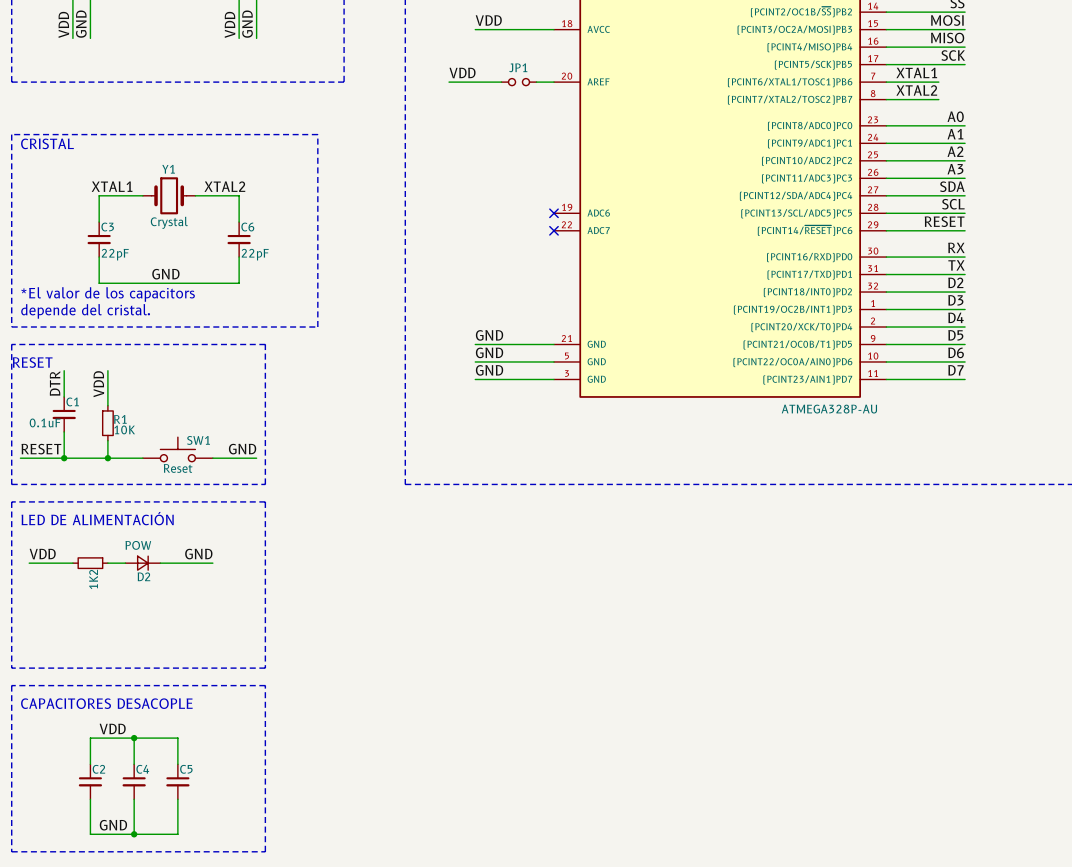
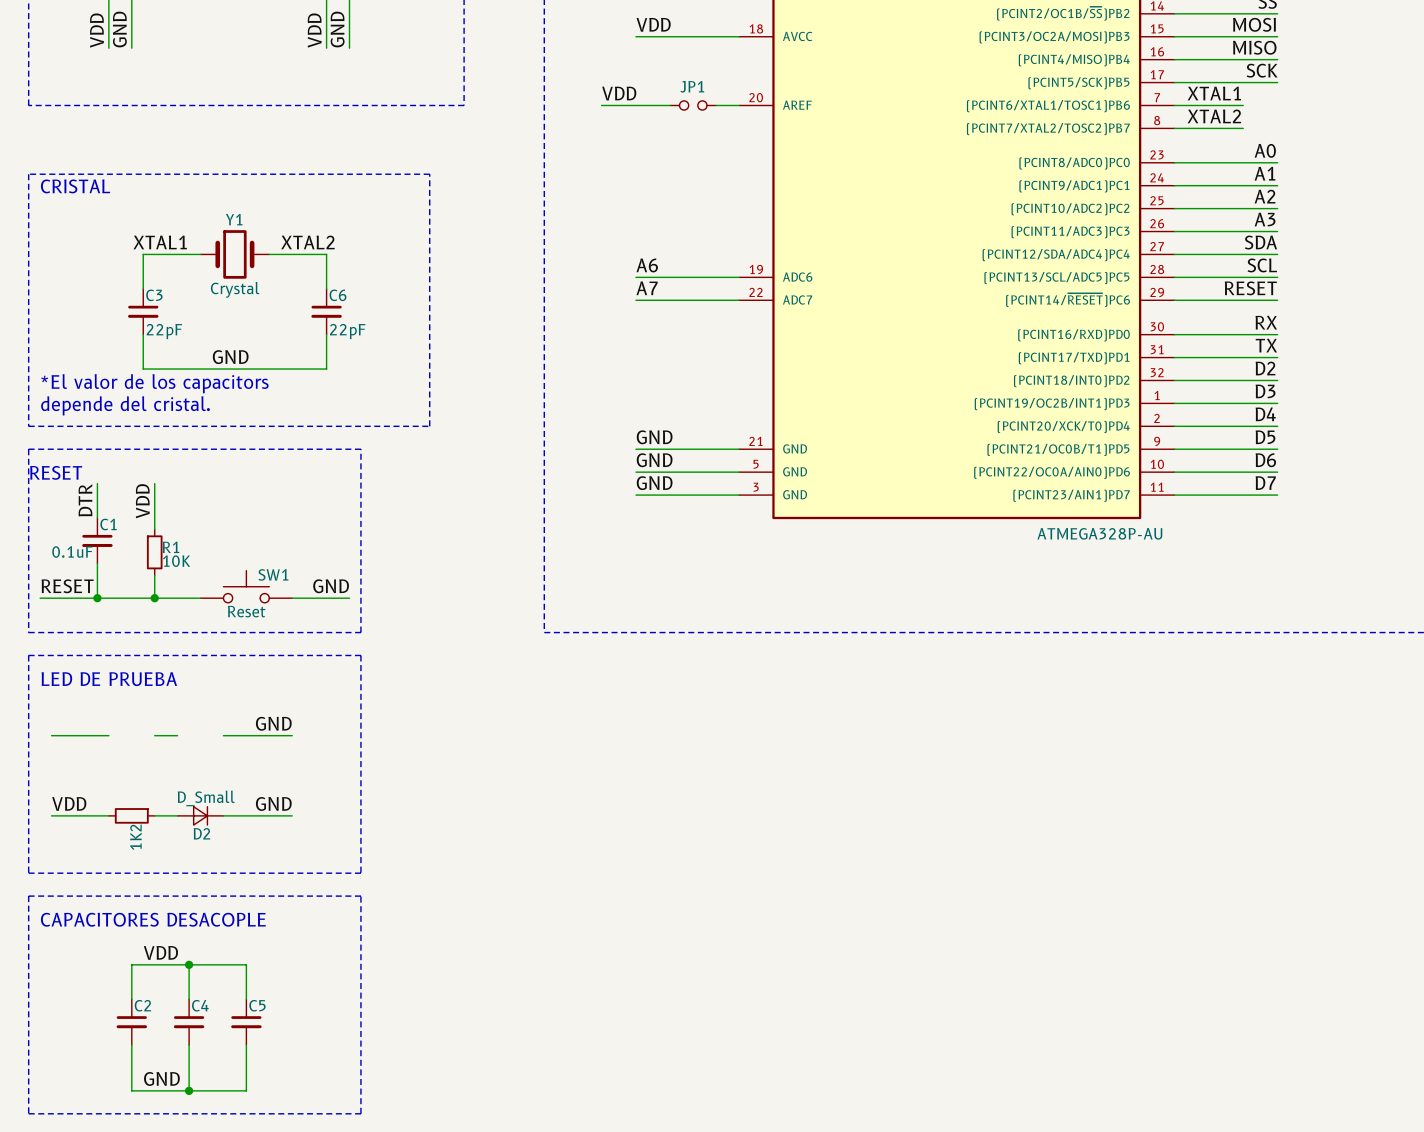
label: none -> A6 (647, 265)
wire: none -> (635, 277) (739, 277)
no-connect mark: (553, 213) -> none
label: none -> A7 (647, 288)
wire: none -> (635, 300) (739, 300)
no-connect mark: (553, 230) -> none
text: LED DE ALIMENTACIÓN (97, 518) -> LED DE PRUEBA (109, 679)
D2 value: POW (138, 545) -> D_Small (206, 798)
label position: VDD (42, 554) -> VDD (69, 803)
1K2 position: (90, 563) -> (131, 815)
D2 position: (142, 563) -> (200, 815)
label: none -> GND (273, 803)
wire: none -> (51, 815) (108, 815)
wire: none -> (154, 815) (177, 815)
wire: none -> (223, 815) (292, 815)

